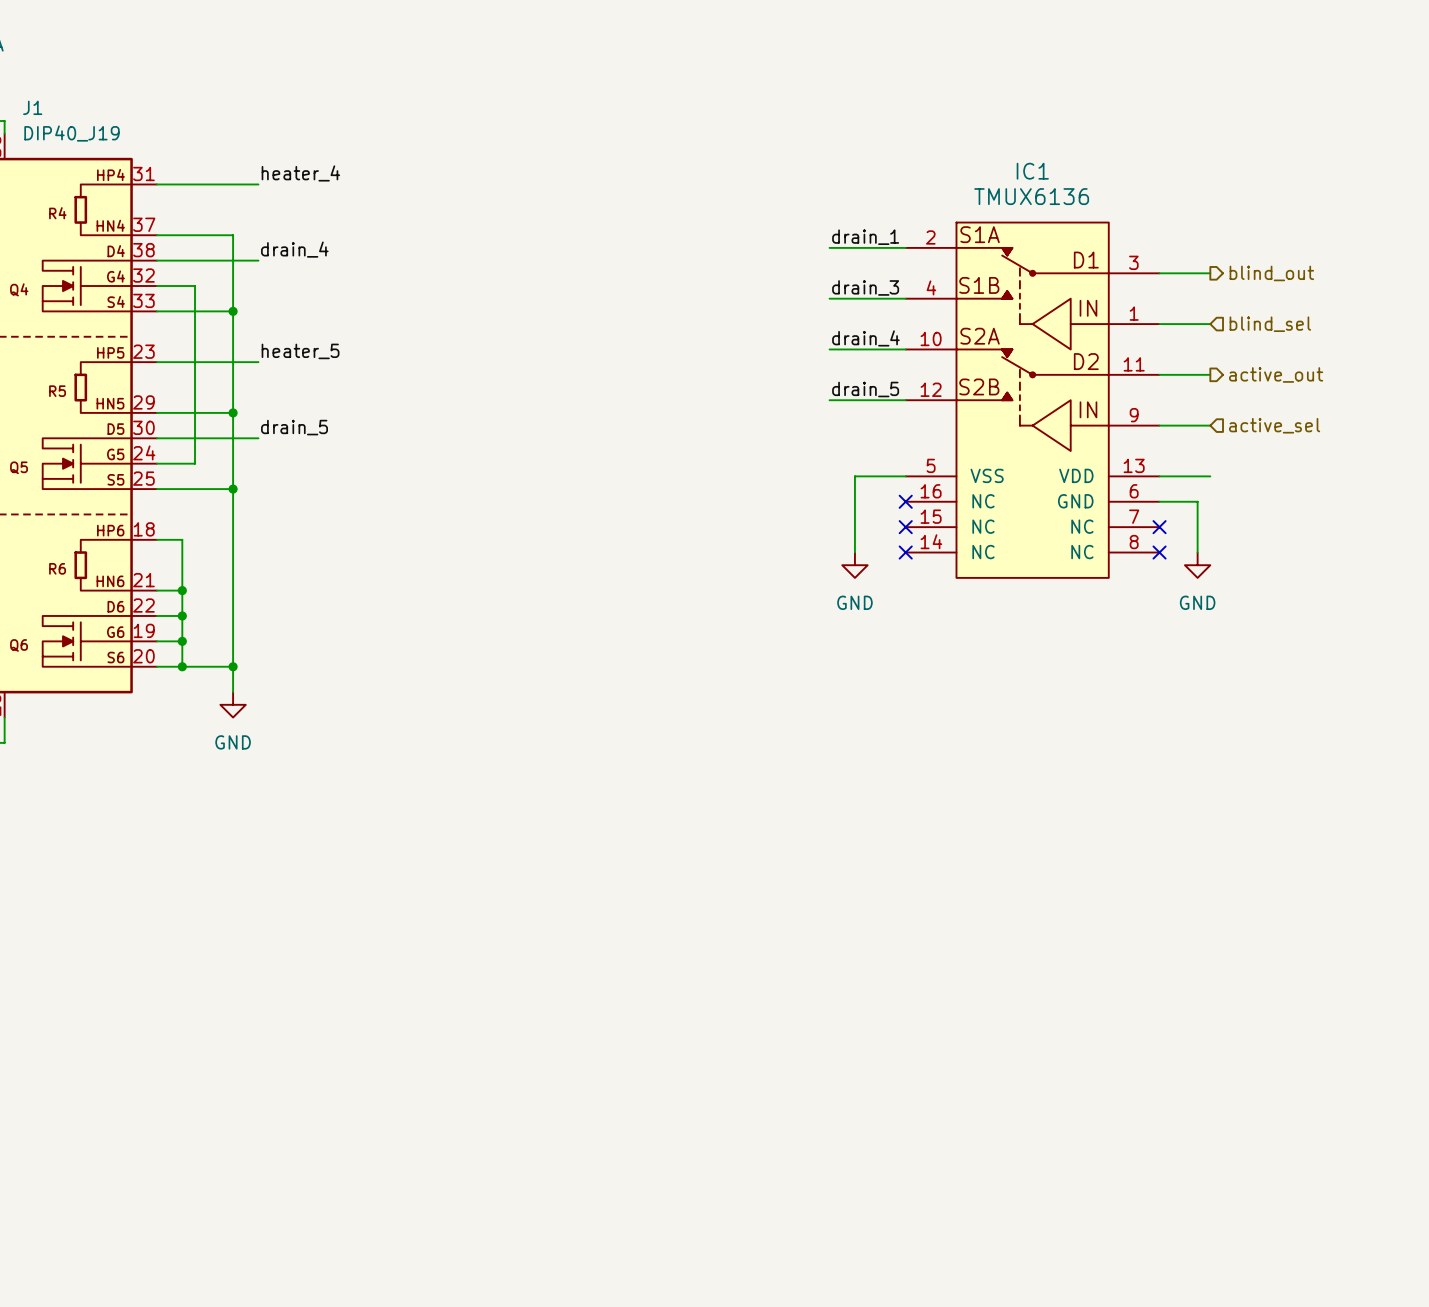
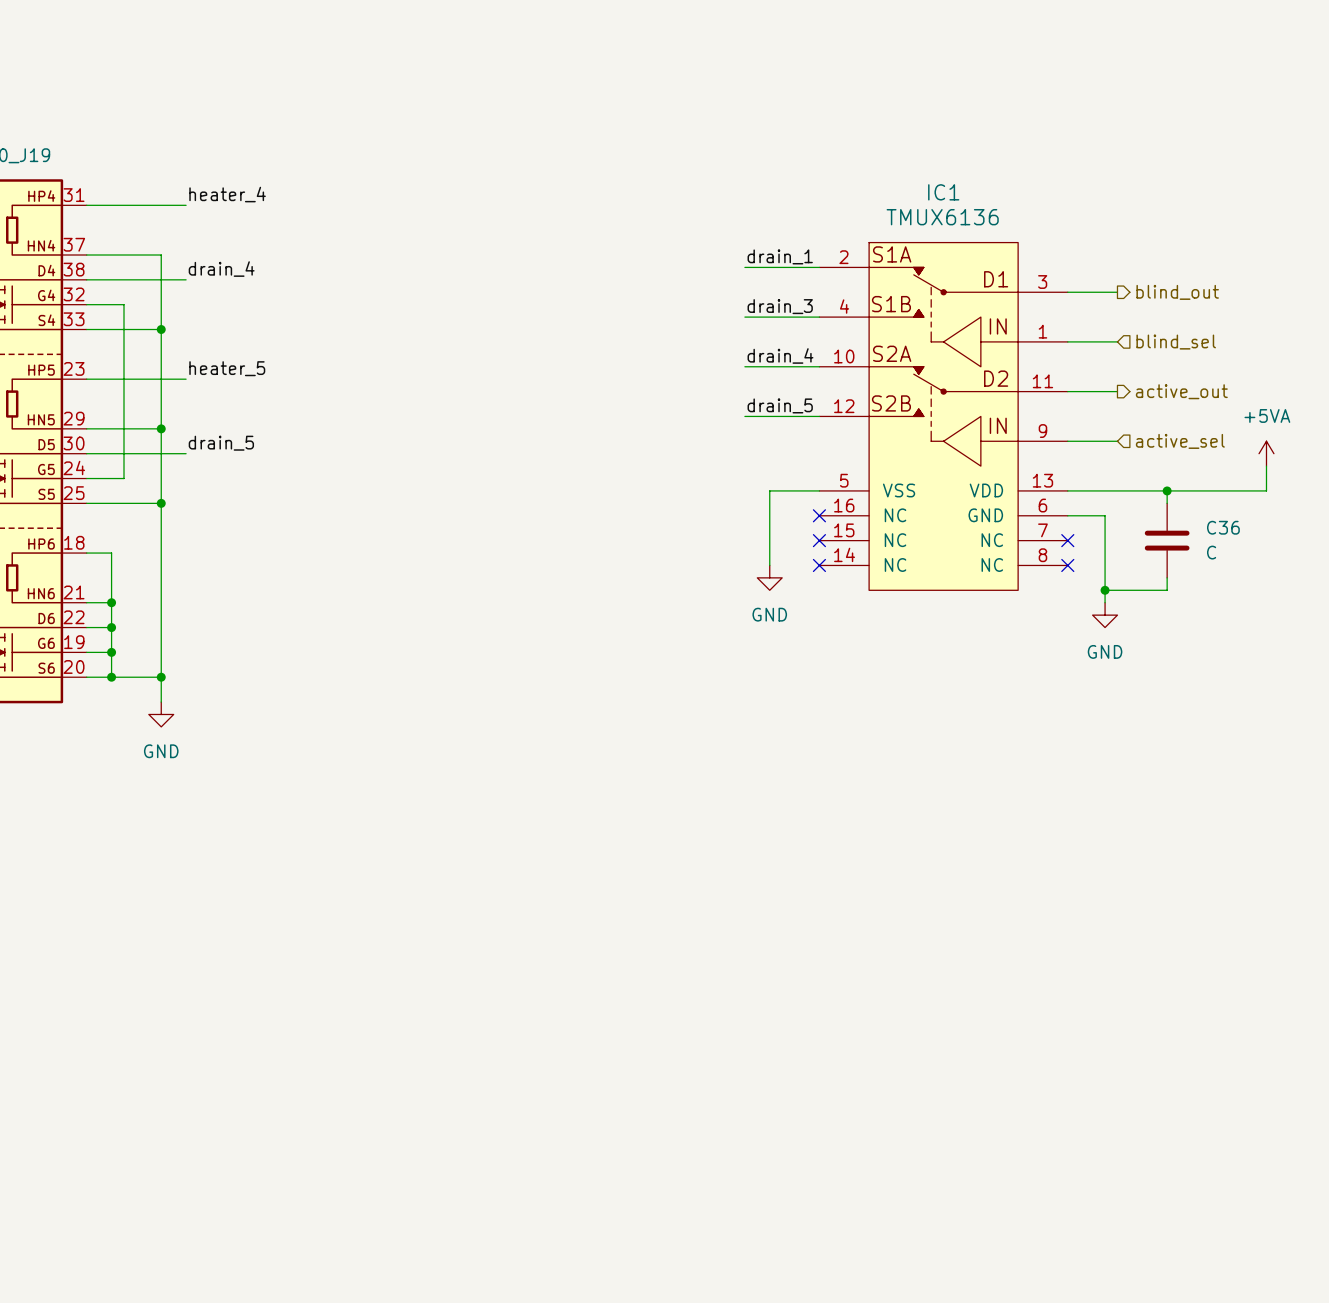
power symbol: none -> +5VA (1266, 453)
wire: none -> (1266, 466) (1266, 490) (1117, 490)
wire: none -> (1167, 490) (1167, 503)
junction: none -> (1167, 490)
C36: none -> C (1167, 540)
wire: none -> (1105, 565) (1105, 602)
power symbol position: GND (1197, 565) -> GND (1105, 615)
wire: none -> (1167, 577) (1167, 590) (1105, 590)
junction: none -> (1105, 590)

